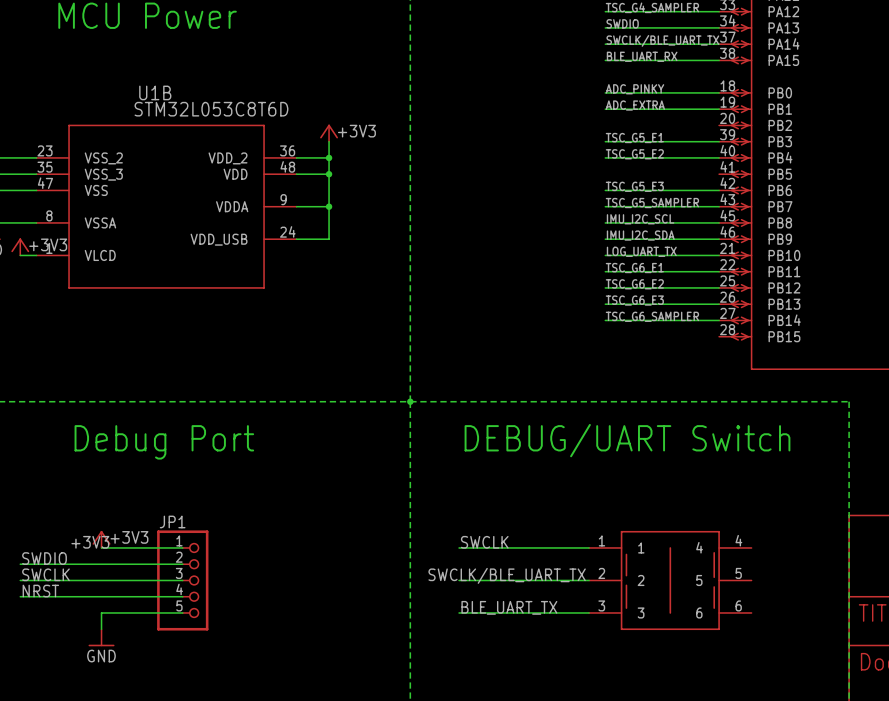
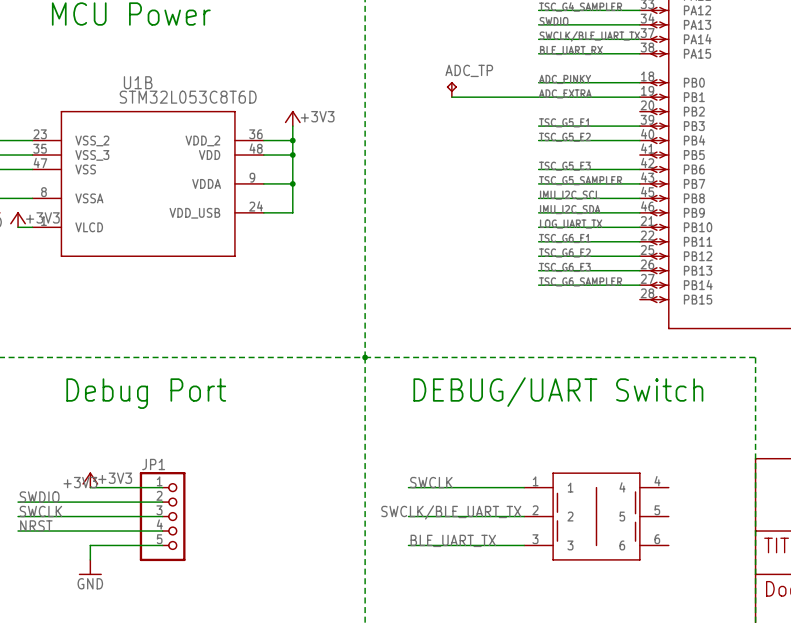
ADC_TP: none -> (451, 89)
wire: none -> (451, 97) (538, 97)

